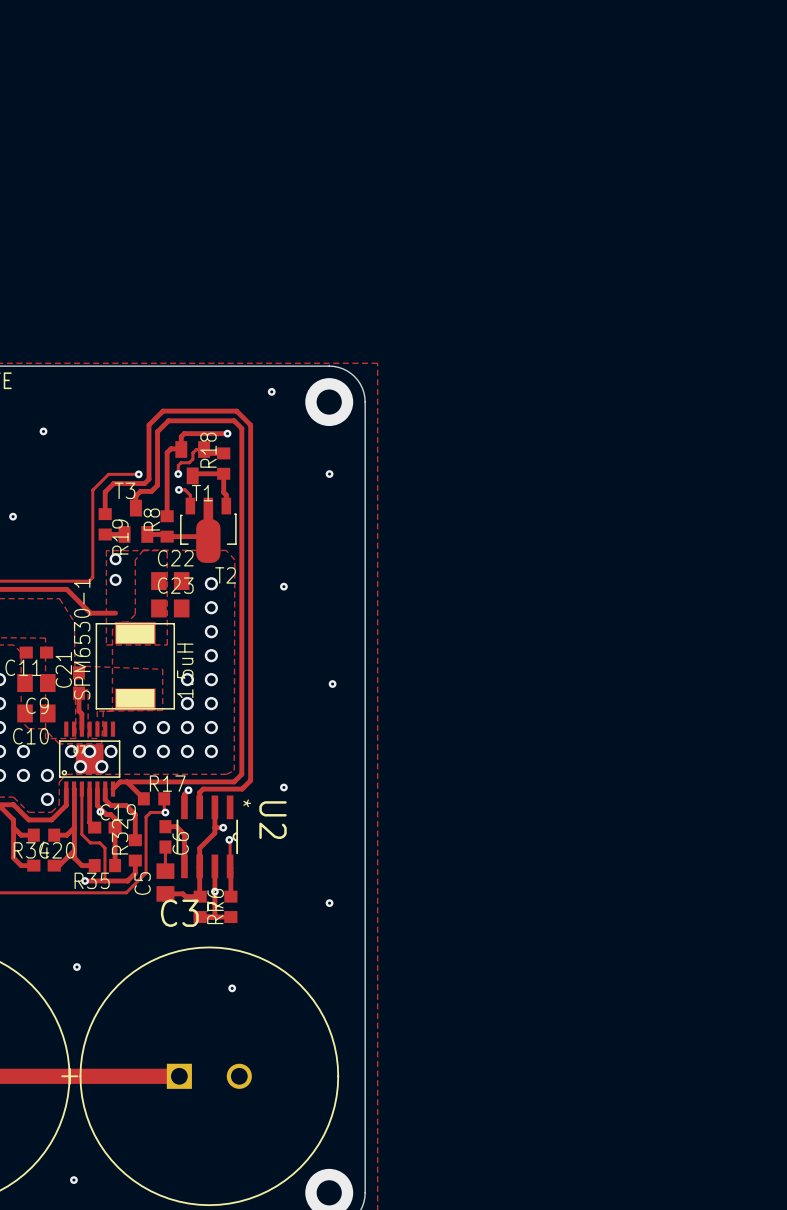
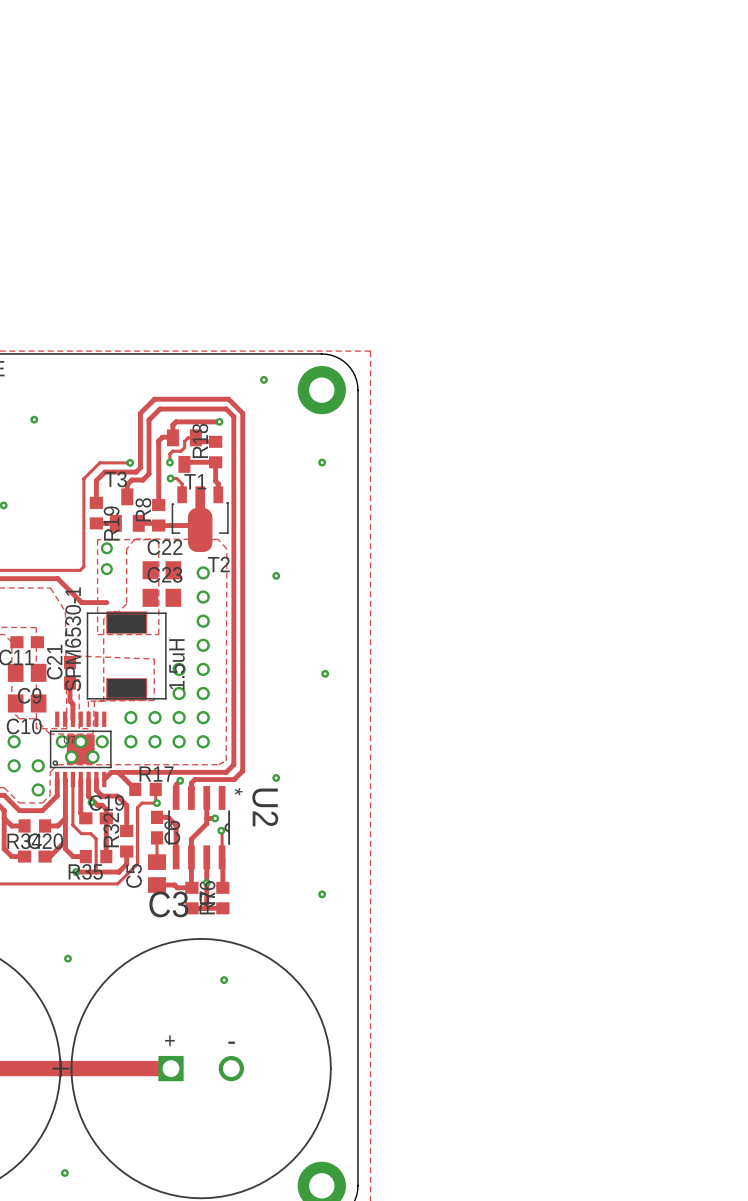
text: none -> + (169, 1040)
text: none -> - (231, 1042)

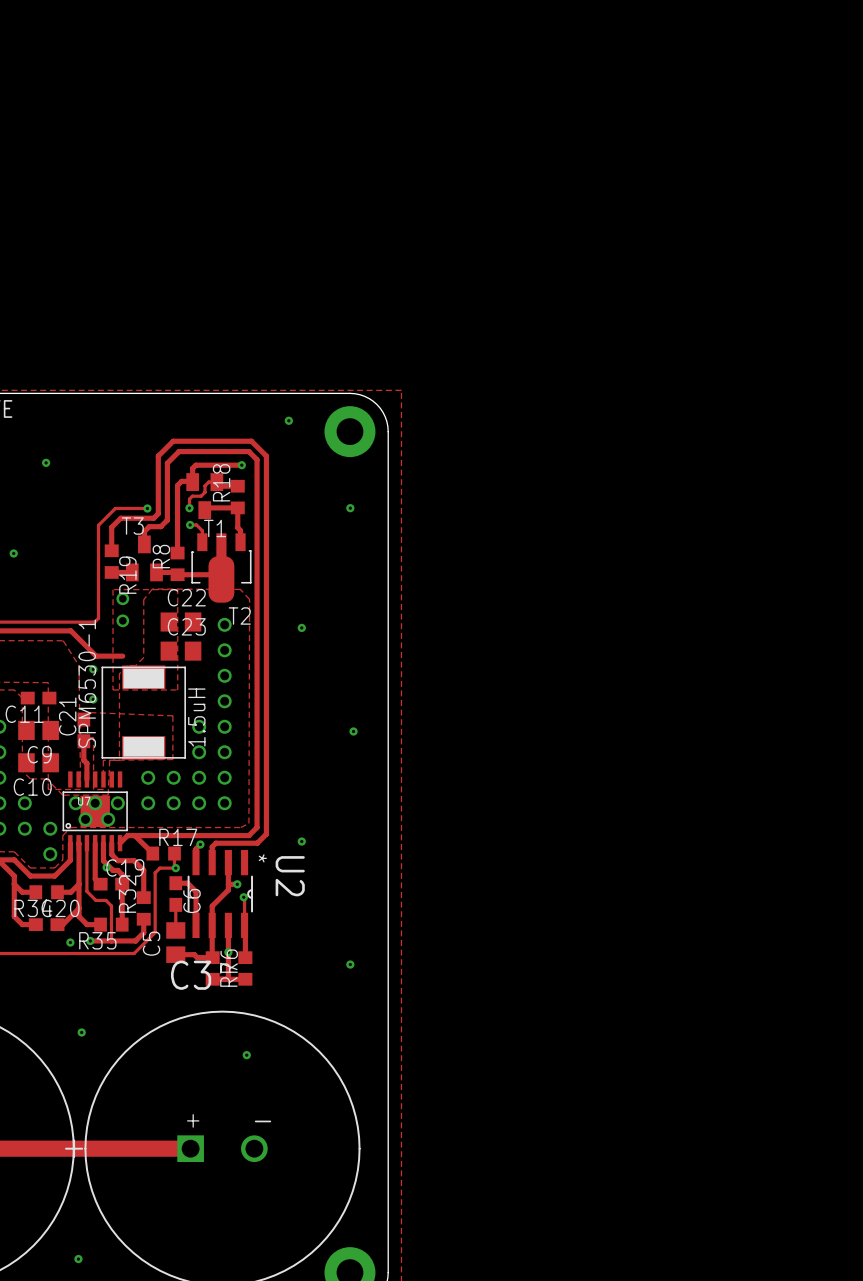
via: none -> (93, 669)
via: none -> (93, 699)
via: none -> (70, 942)

